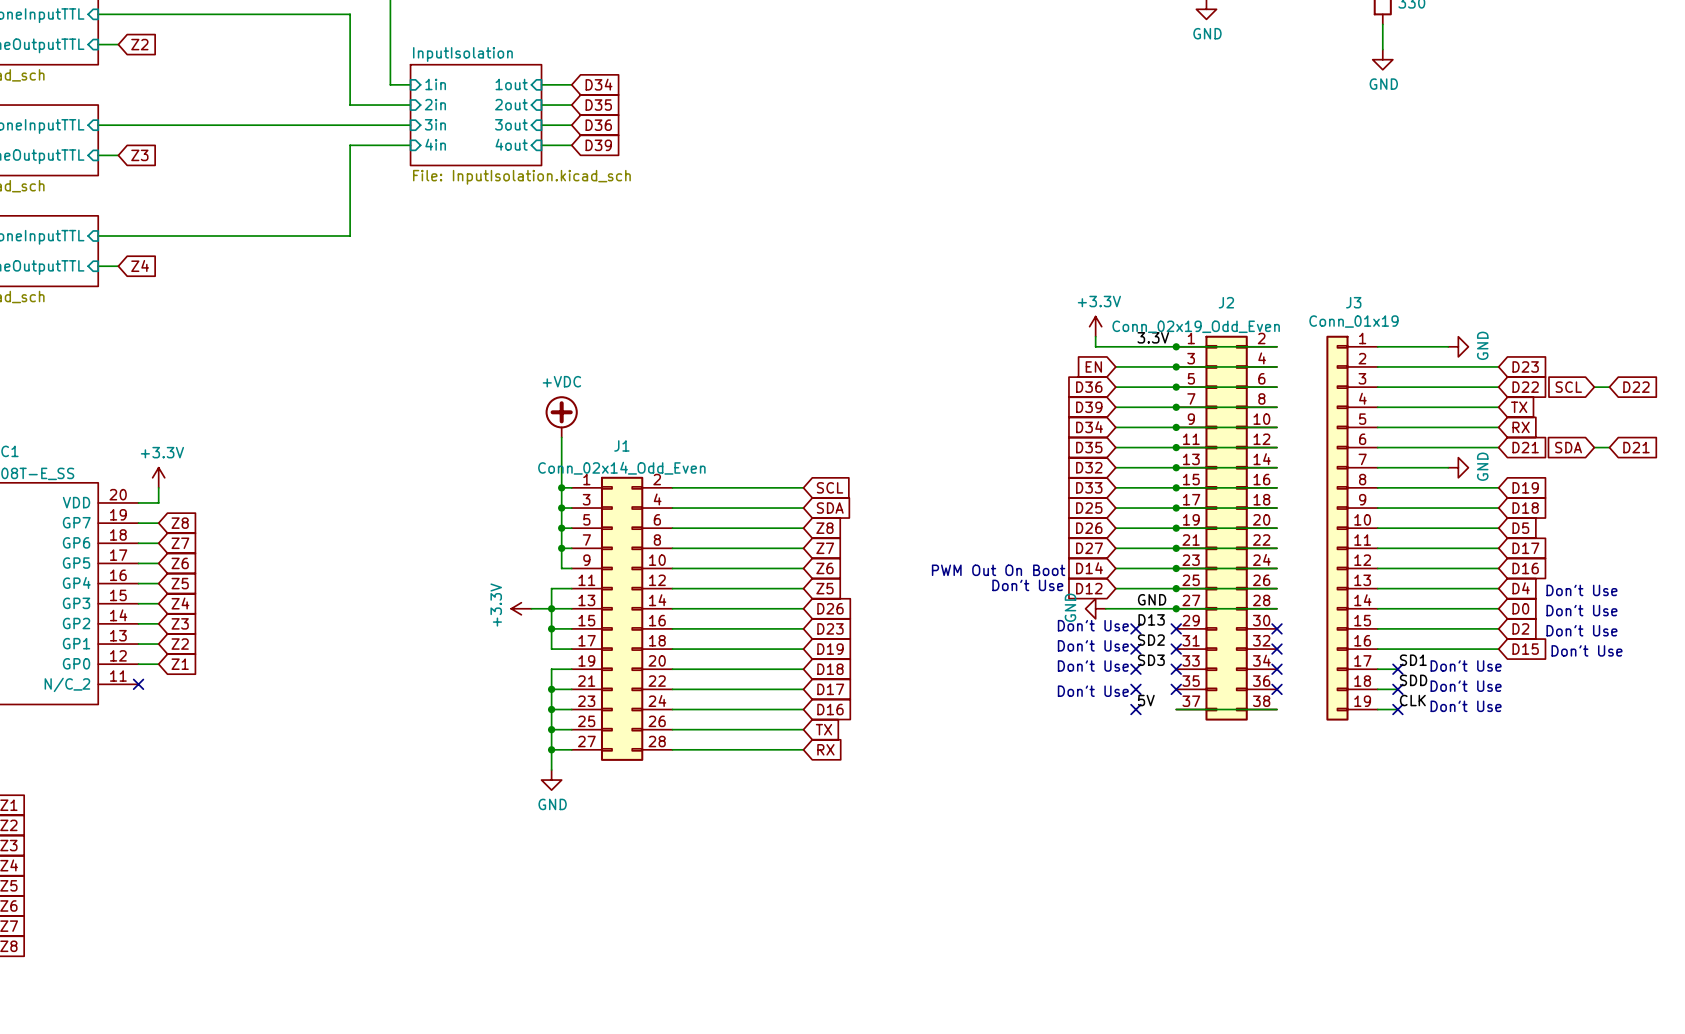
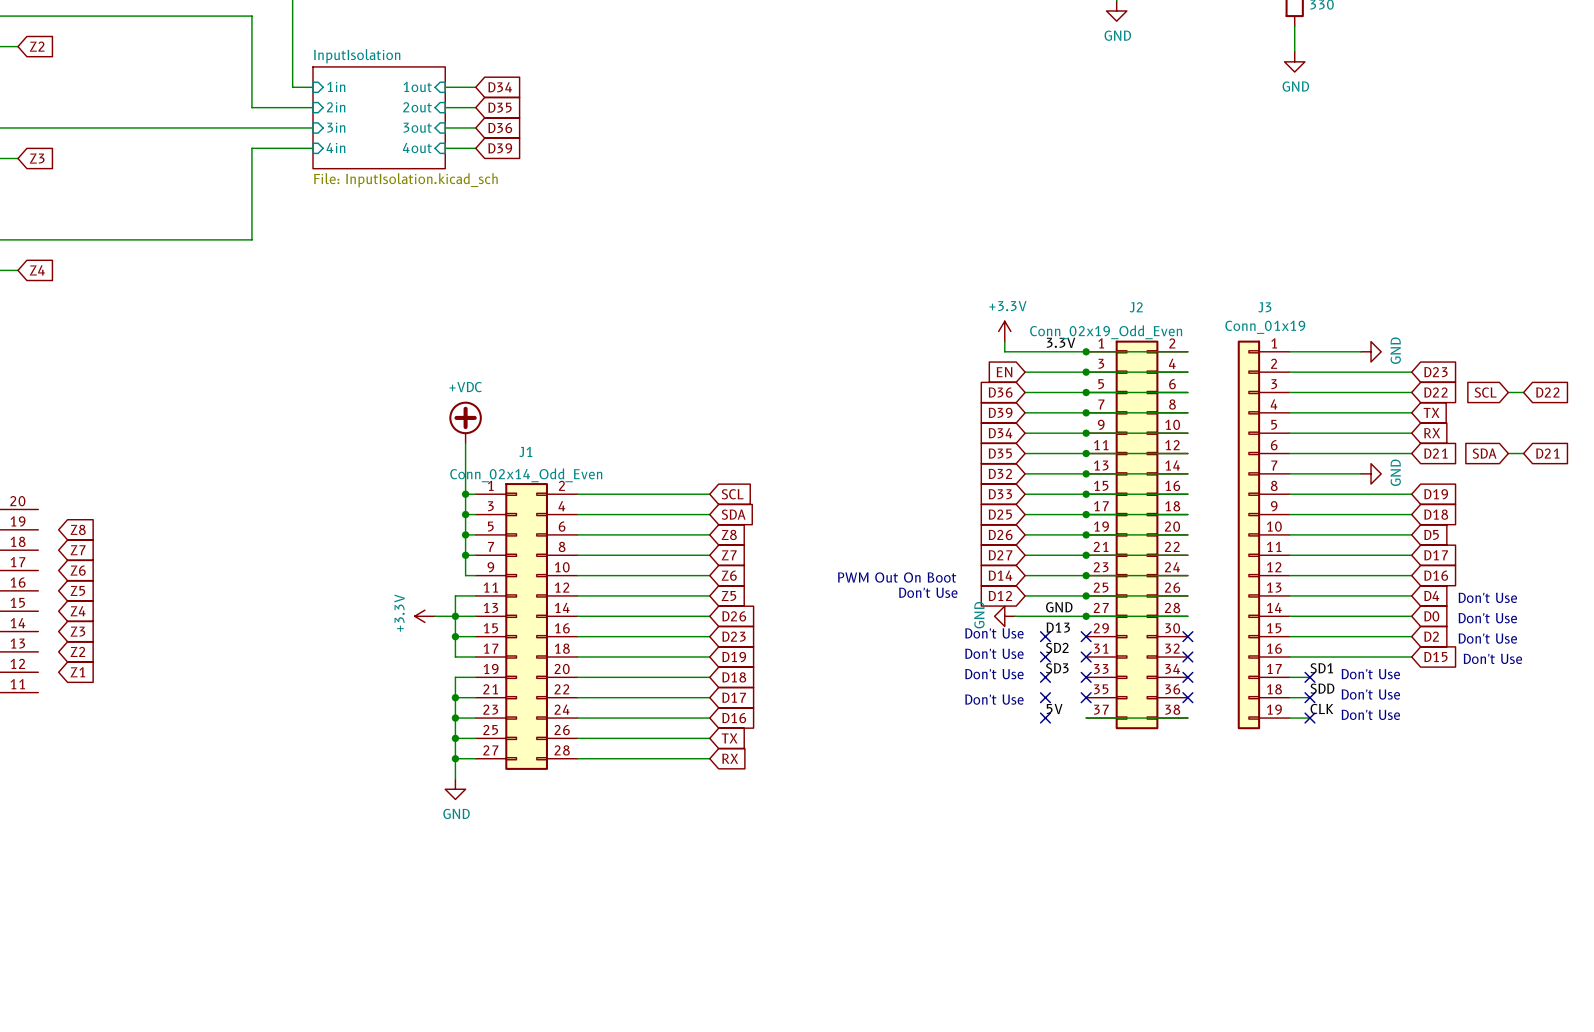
power symbol: +3.3V (158, 477) -> none
wire: (158, 487) (158, 502) (138, 502) -> none
wire: (138, 523) (158, 523) -> none
wire: (138, 543) (158, 543) -> none
wire: (138, 563) (158, 563) -> none
wire: (138, 583) (158, 583) -> none
wire: (138, 603) (158, 603) -> none
wire: (138, 623) (158, 623) -> none
wire: (138, 644) (158, 644) -> none
wire: (138, 664) (158, 664) -> none
no-connect mark: (138, 684) -> none

